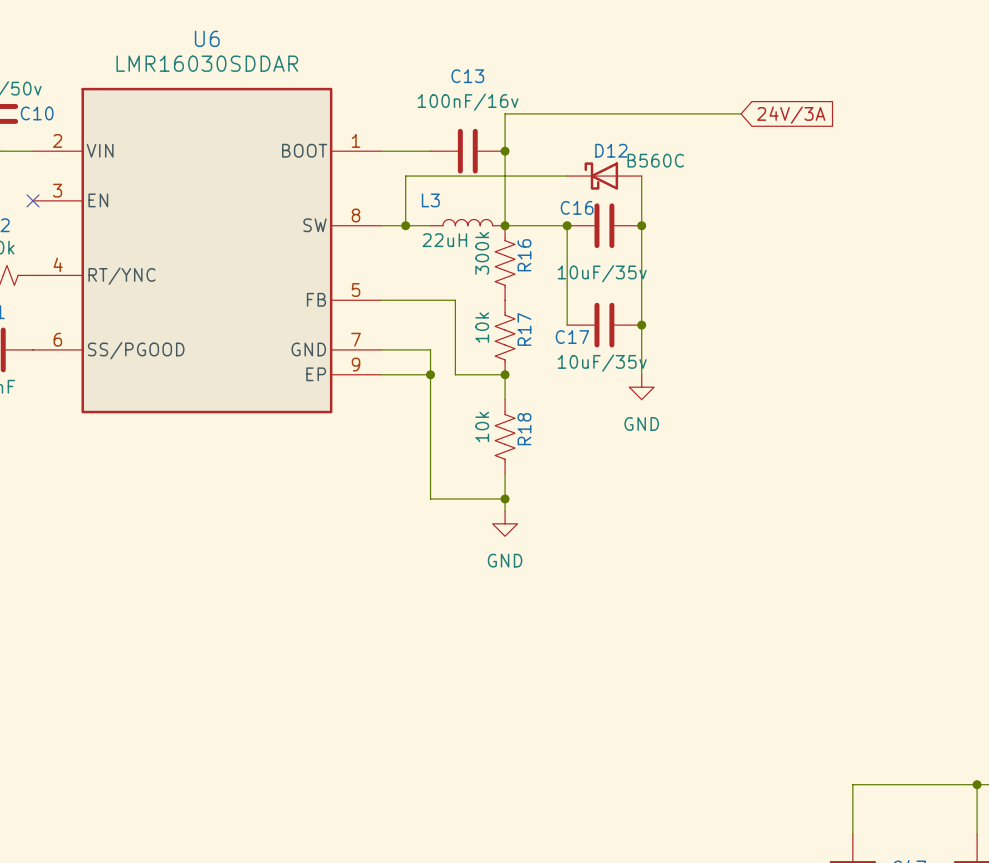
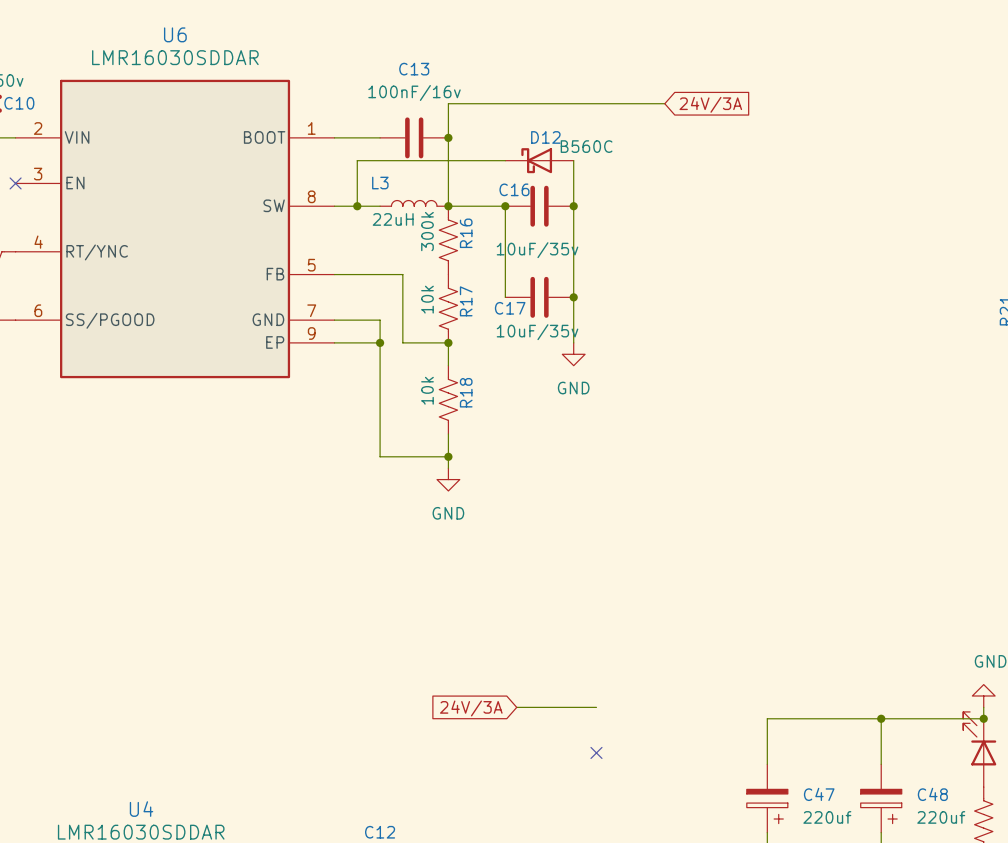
wire: none -> (516, 707) (596, 707)
global label: none -> 24V/3A (471, 708)
no-connect mark: none -> (596, 752)

